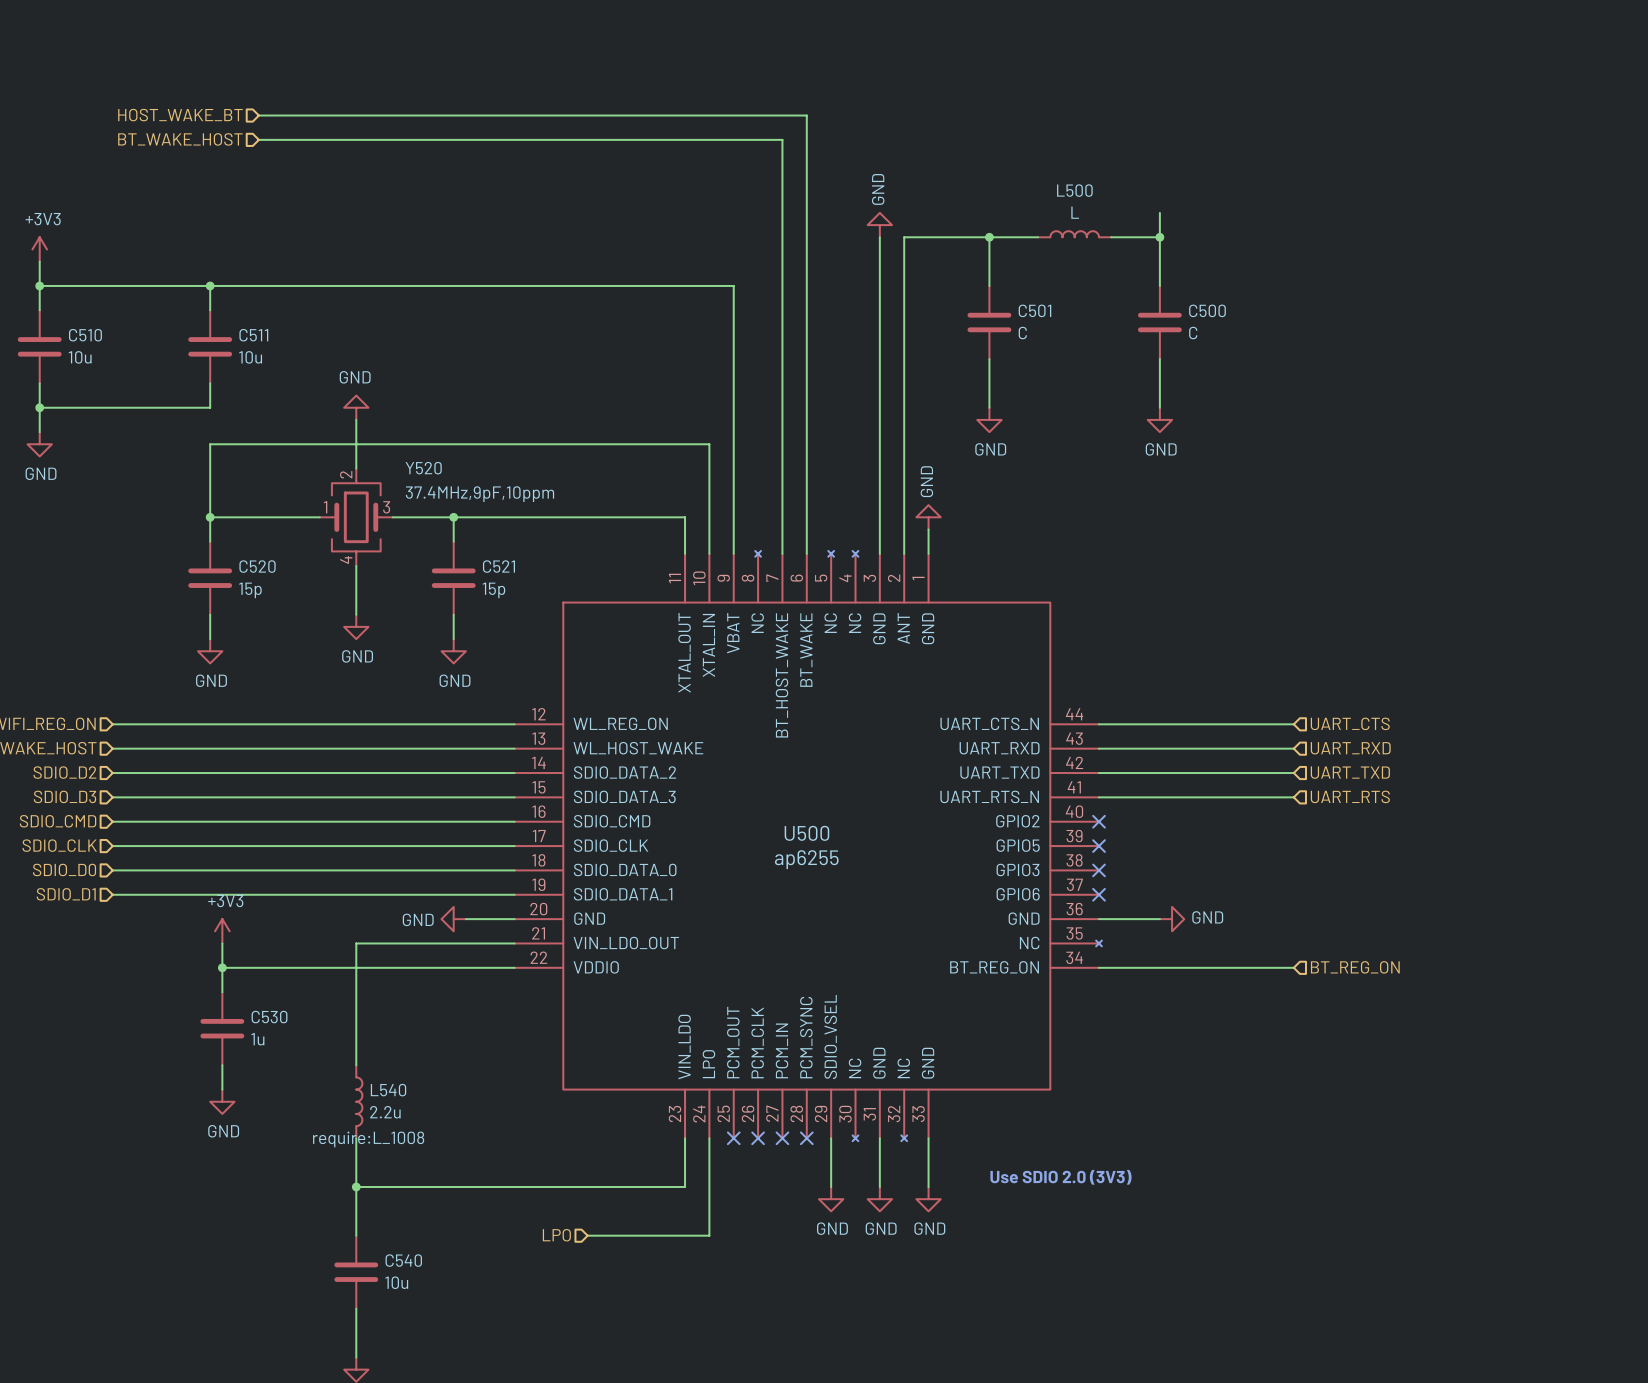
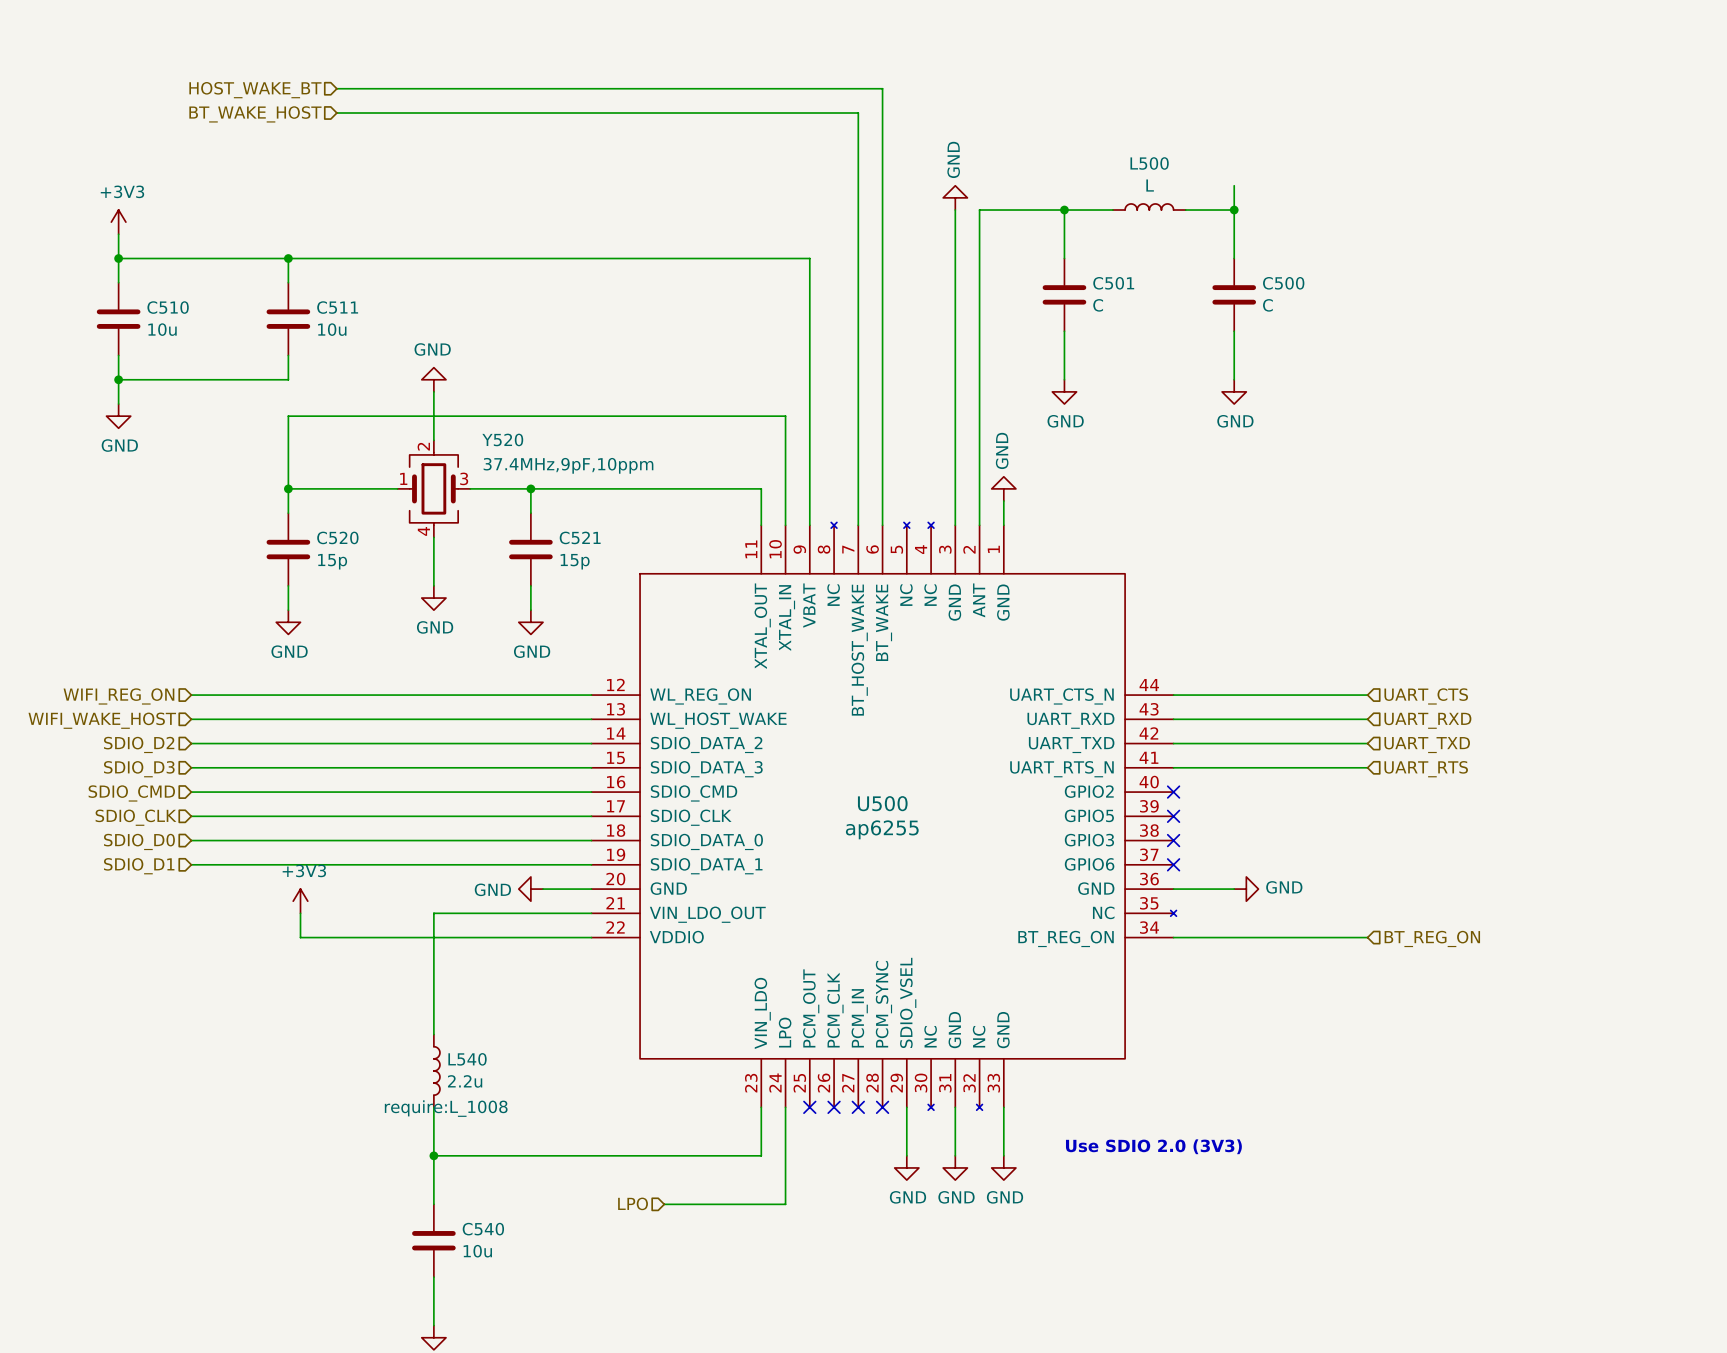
wire: (222, 967) (222, 992) -> none
junction: (222, 967) -> none
C530: 1u (222, 1028) -> none
wire: (222, 1065) (222, 1089) -> none
power symbol: GND (222, 1101) -> none

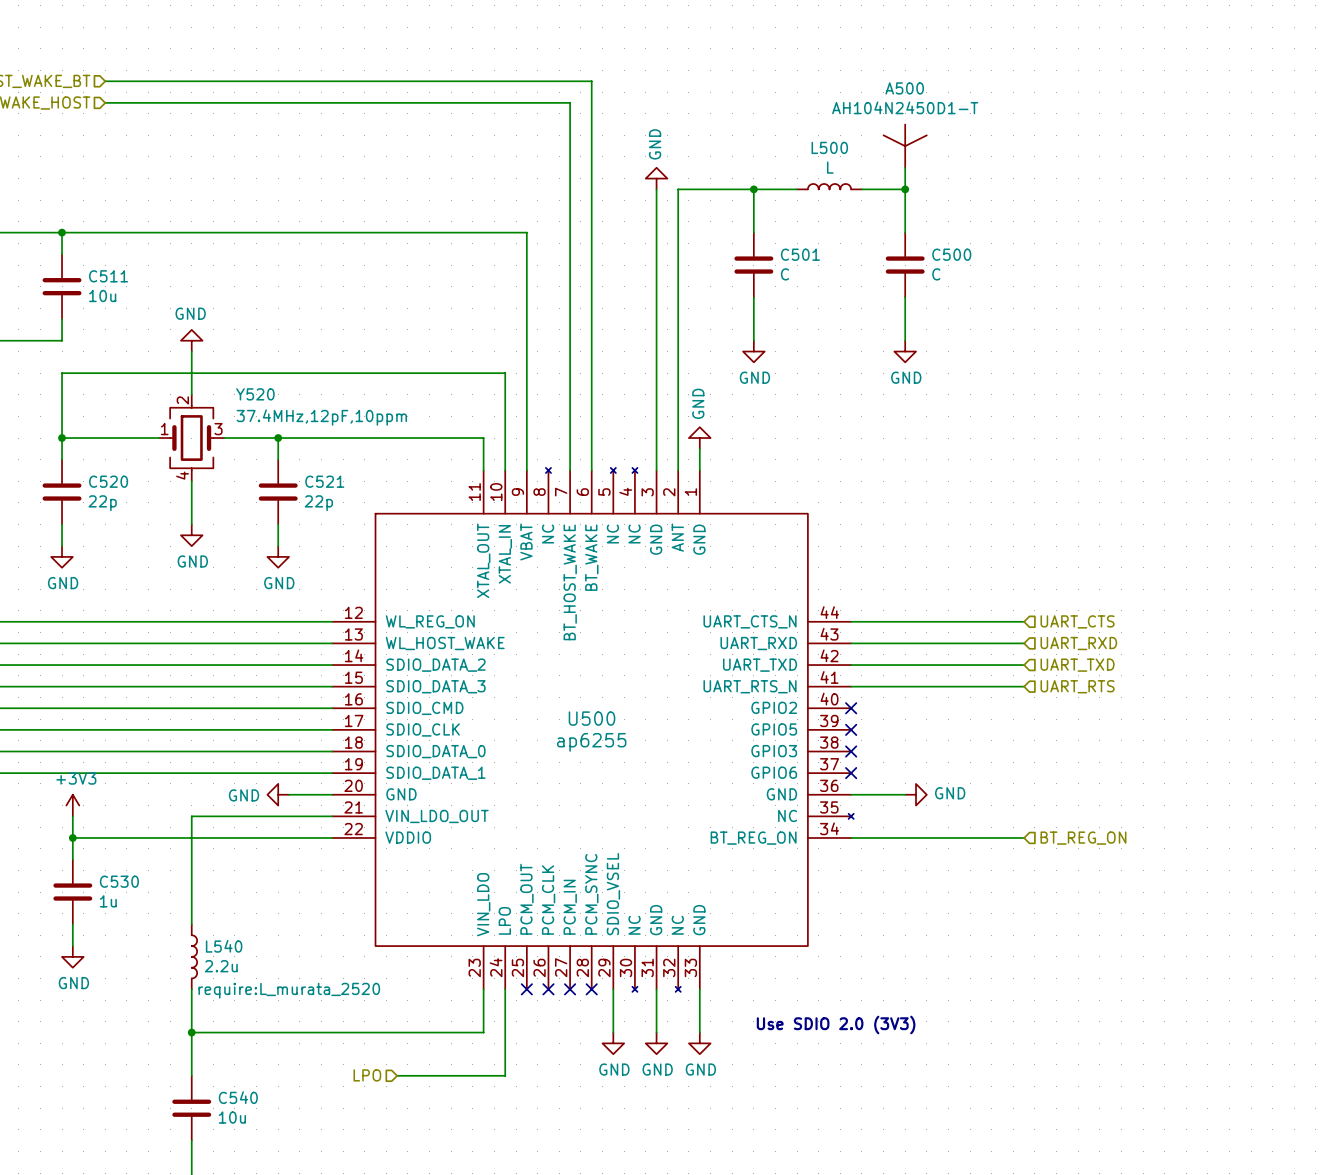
A500: none -> AH104N2450D1-T (905, 146)
Y520 value: 37.4MHz,9pF,10ppm (568, 465) -> 37.4MHz,12pF,10ppm (321, 417)
C520 value: 15p (332, 561) -> 22p (102, 503)
C521 value: 15p (575, 561) -> 22p (318, 503)
wire: none -> (72, 837) (72, 859)
junction: none -> (72, 837)
C530: none -> 1u (72, 892)
wire: none -> (72, 924) (72, 946)
power symbol: none -> GND (72, 956)
L540 text: require:L_1008 (446, 1108) -> require:L_murata_2520 (289, 990)

